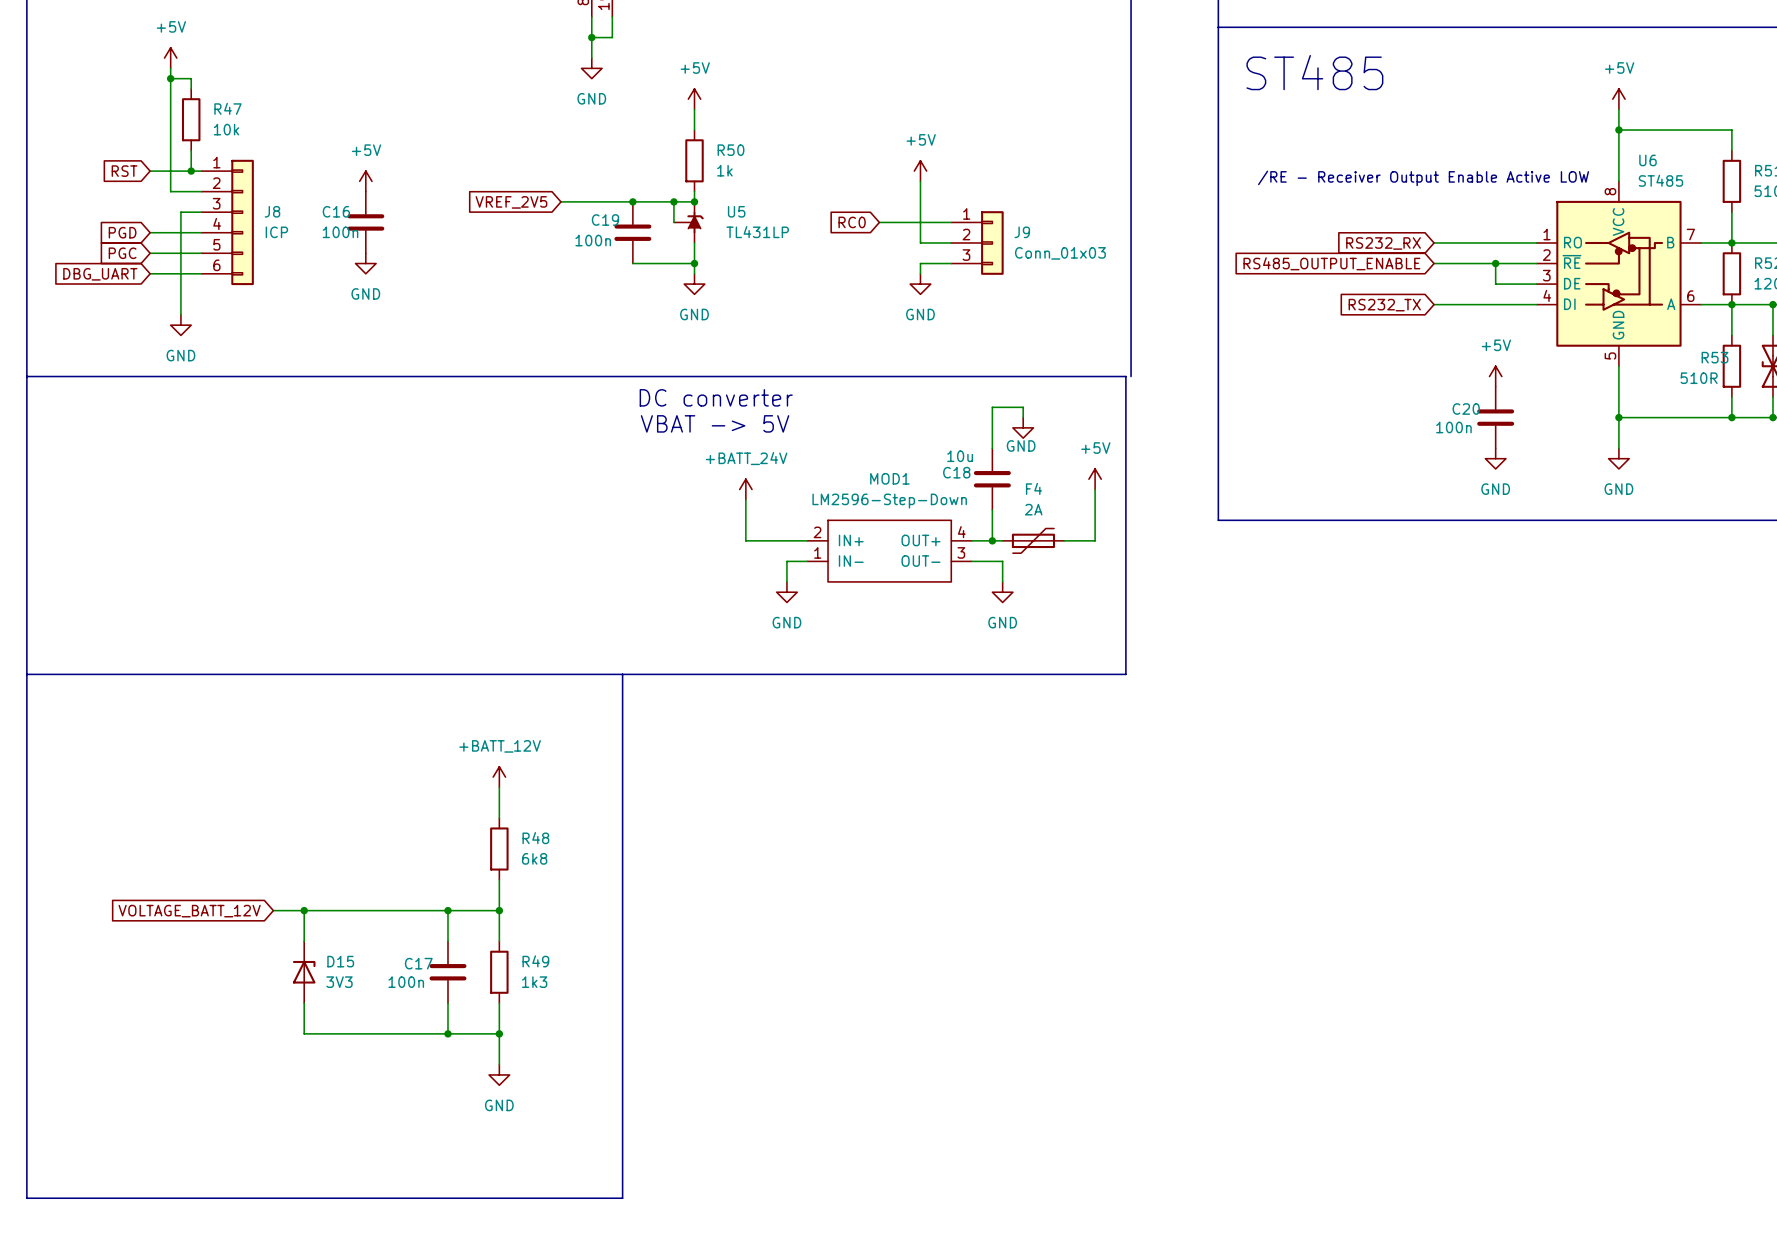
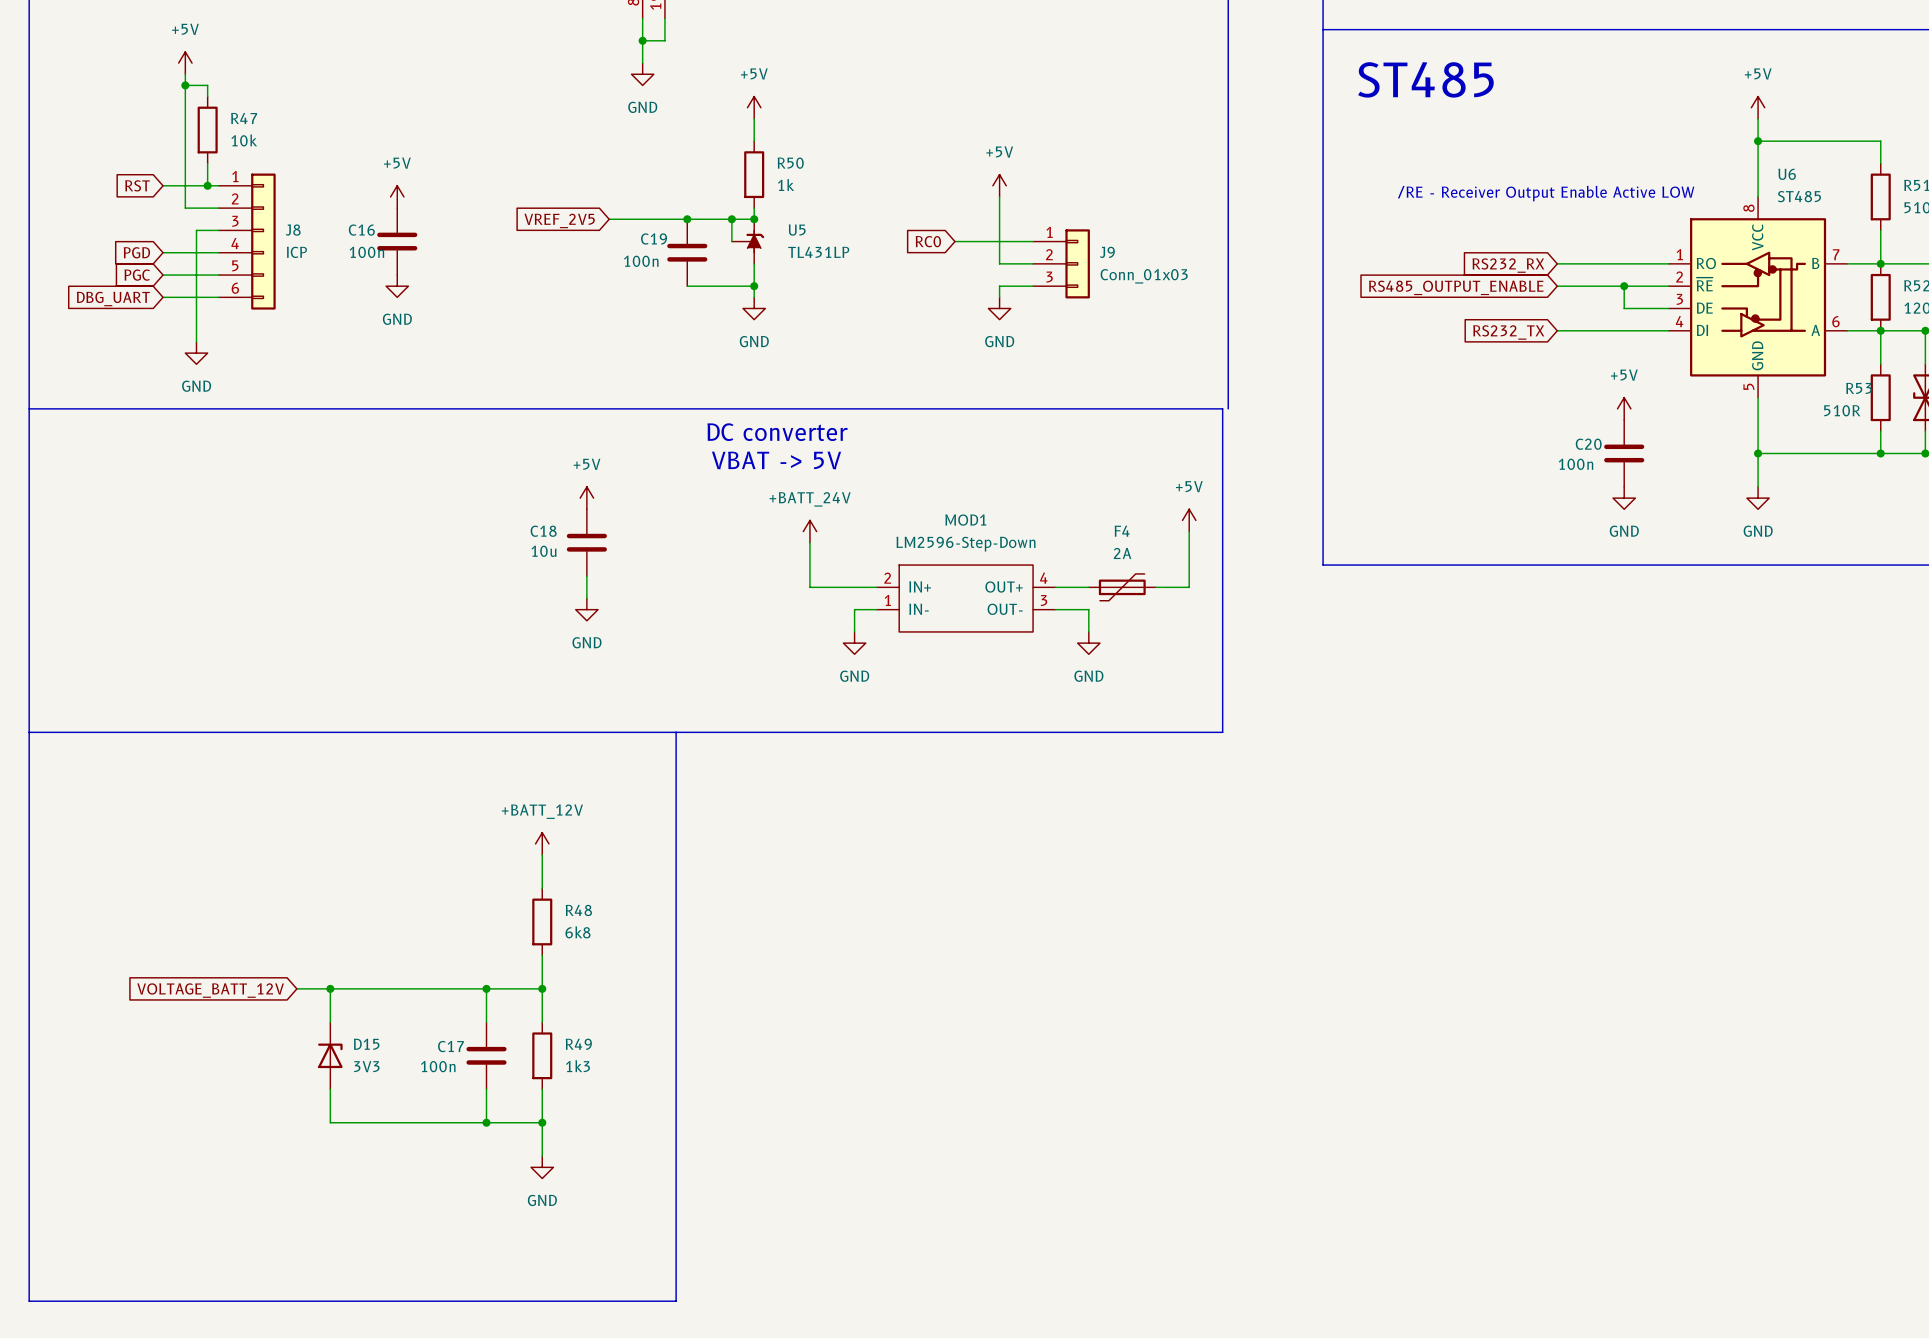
wire: (1023, 417) (1023, 407) (992, 407) (992, 448) -> none
power symbol: GND (1023, 427) -> none
C18 value position: 10u (960, 456) -> 10u (543, 551)
power symbol: none -> +5V (586, 498)
C18 name position: C18 (956, 472) -> C18 (543, 531)
C18 position: (992, 479) -> (586, 542)
wire: (992, 510) (992, 540) -> none
wire: none -> (586, 576) (586, 598)
junction: (992, 540) -> none
power symbol: none -> GND (586, 609)

